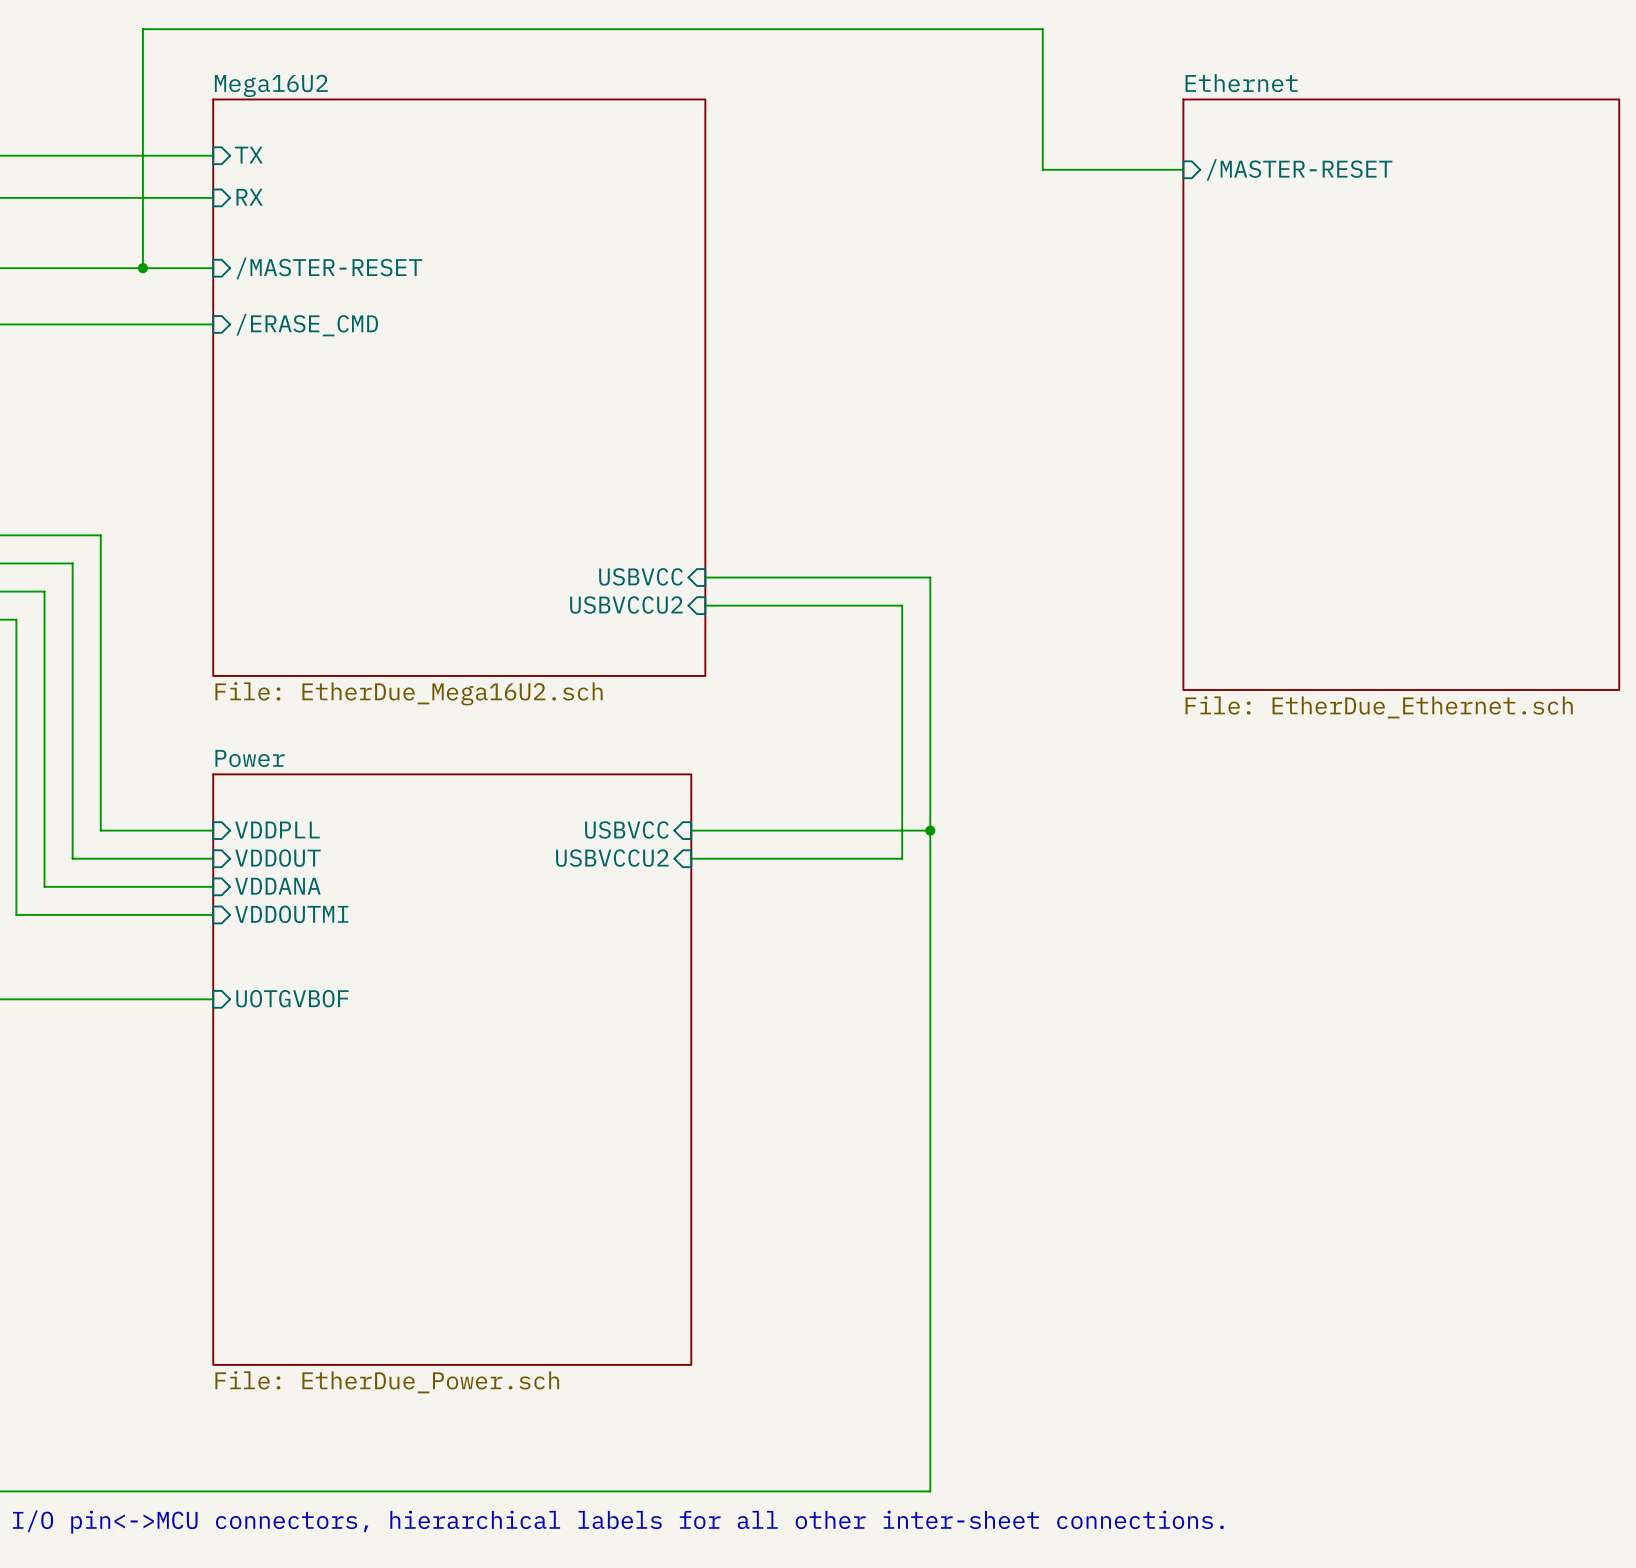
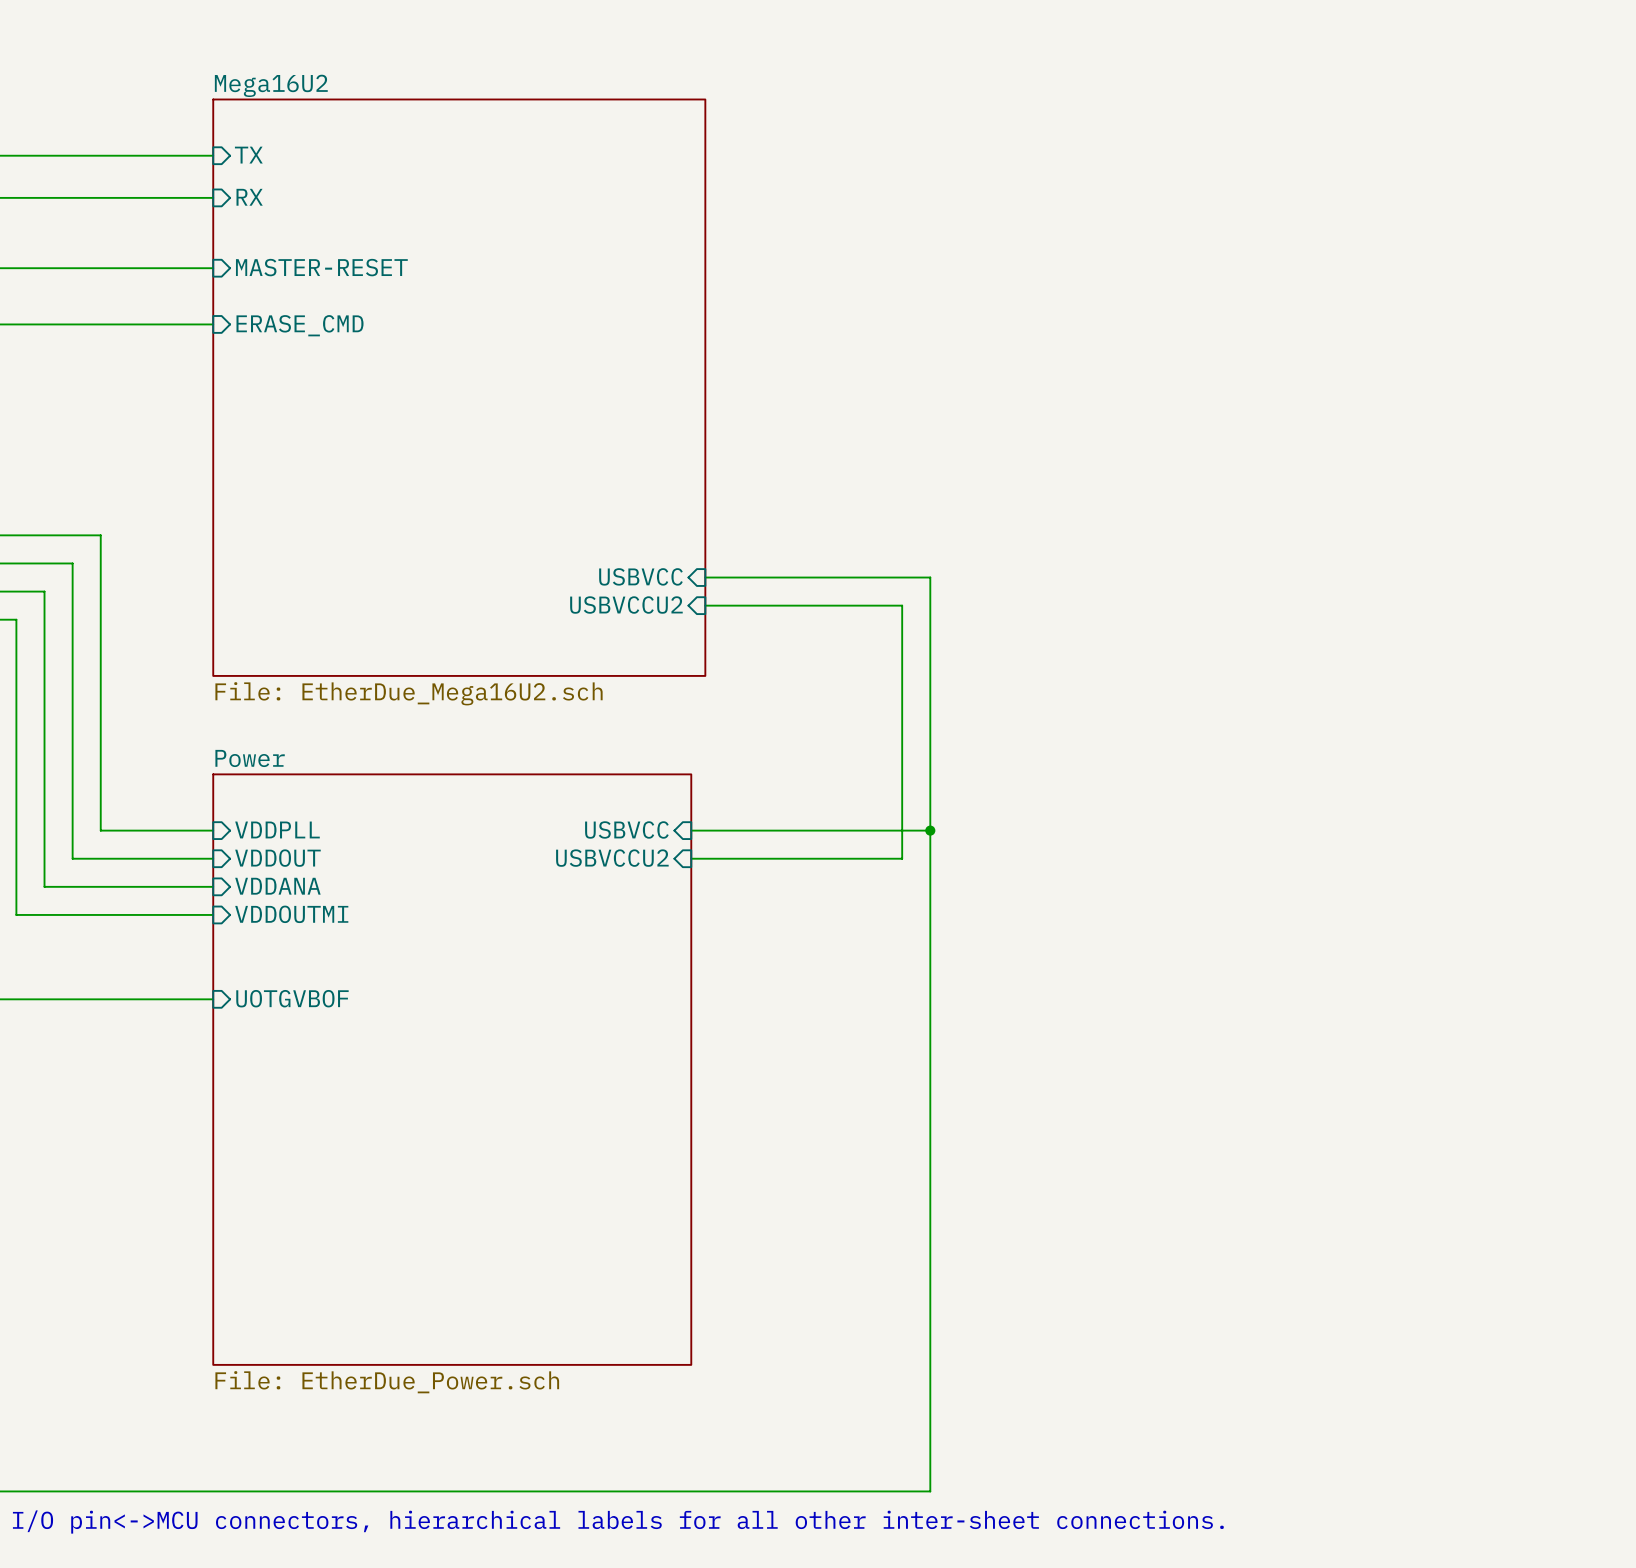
wire: (1183, 169) (1042, 169) (1042, 29) (142, 29) (142, 268) -> none
sheet pin: /MASTER-RESET (1299, 170) -> none
junction: (142, 268) -> none
sheet pin: /MASTER-RESET (329, 268) -> MASTER-RESET (321, 267)
sheet pin: /ERASE_CMD (307, 325) -> ERASE_CMD (300, 325)
sheet Ethernet: File: EtherDue_Ethernet.sch (1401, 394) -> none

